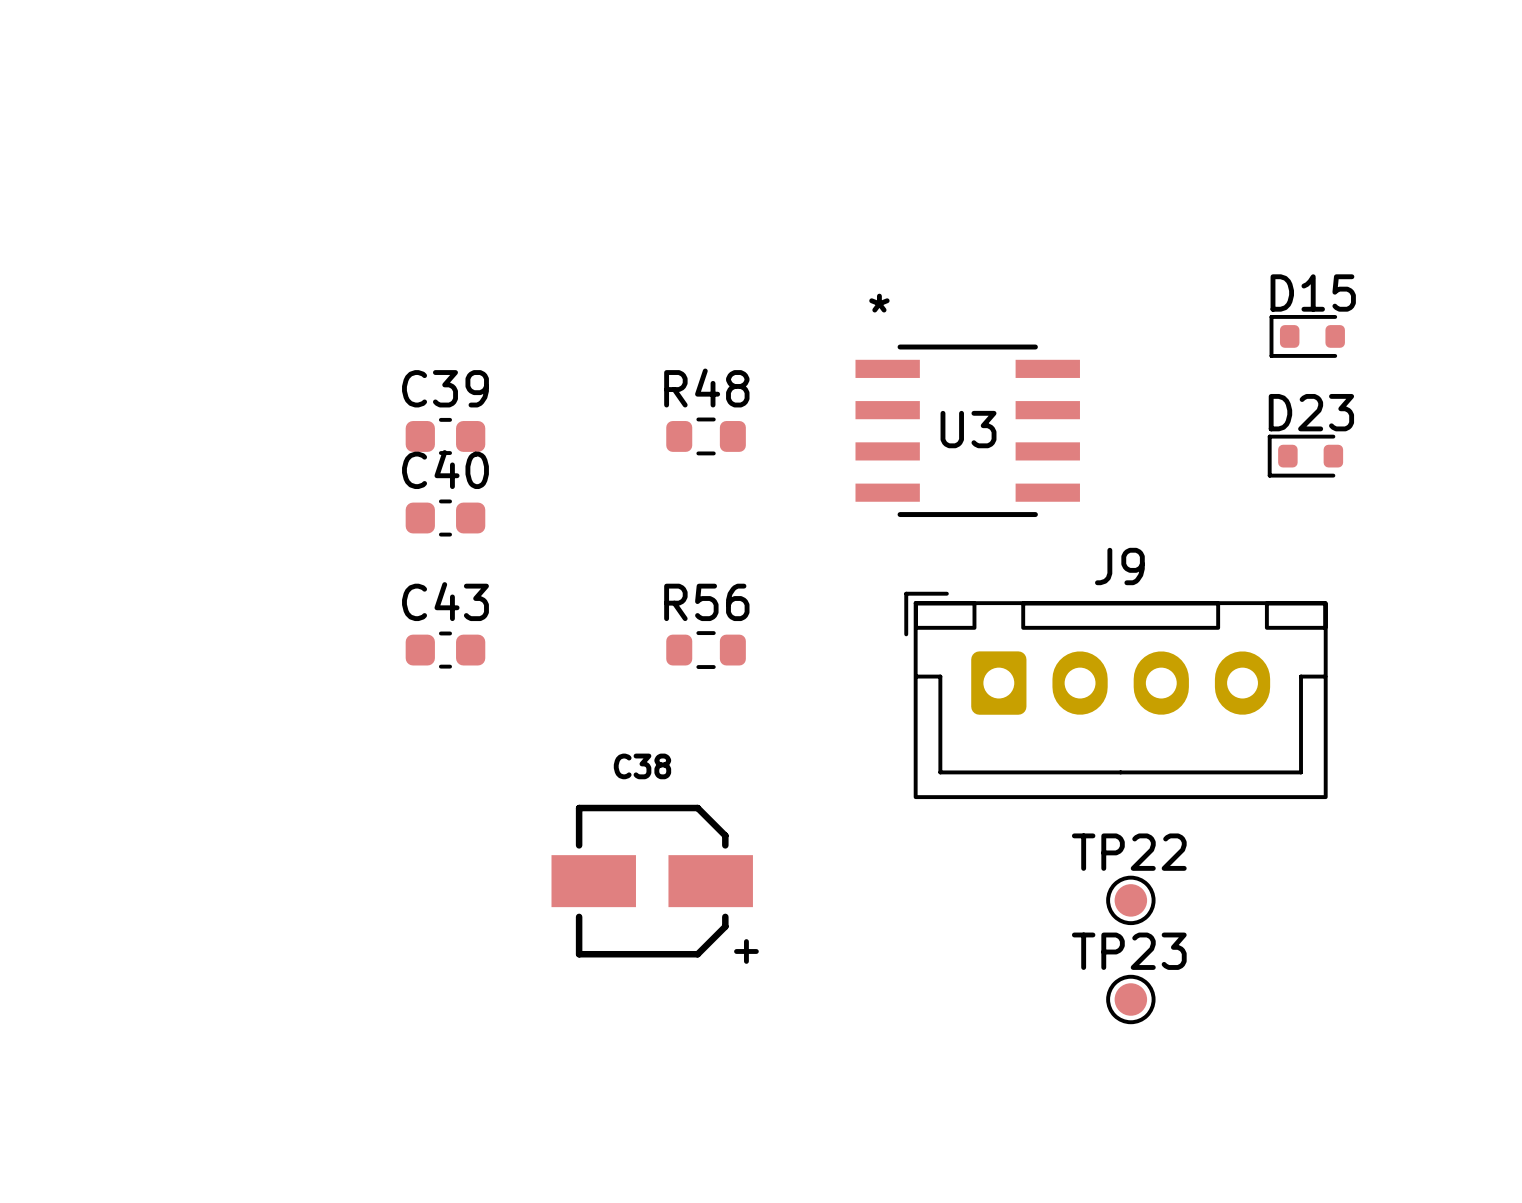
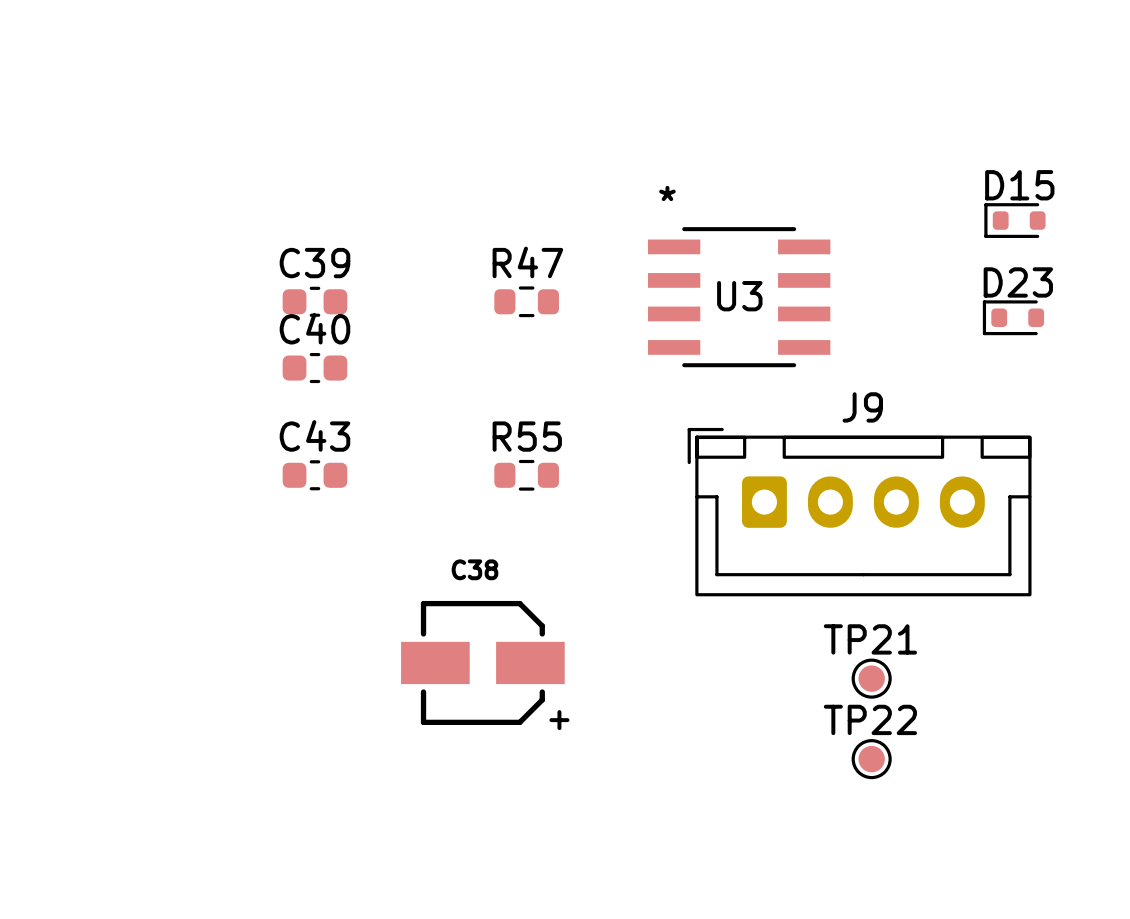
R48 name: R48 (706, 388) -> R47 (527, 262)
R56 name: R56 (706, 602) -> R55 (527, 436)
TP22 name: TP22 (1129, 852) -> TP21 (870, 639)
TP23 name: TP23 (1129, 951) -> TP22 (870, 719)

